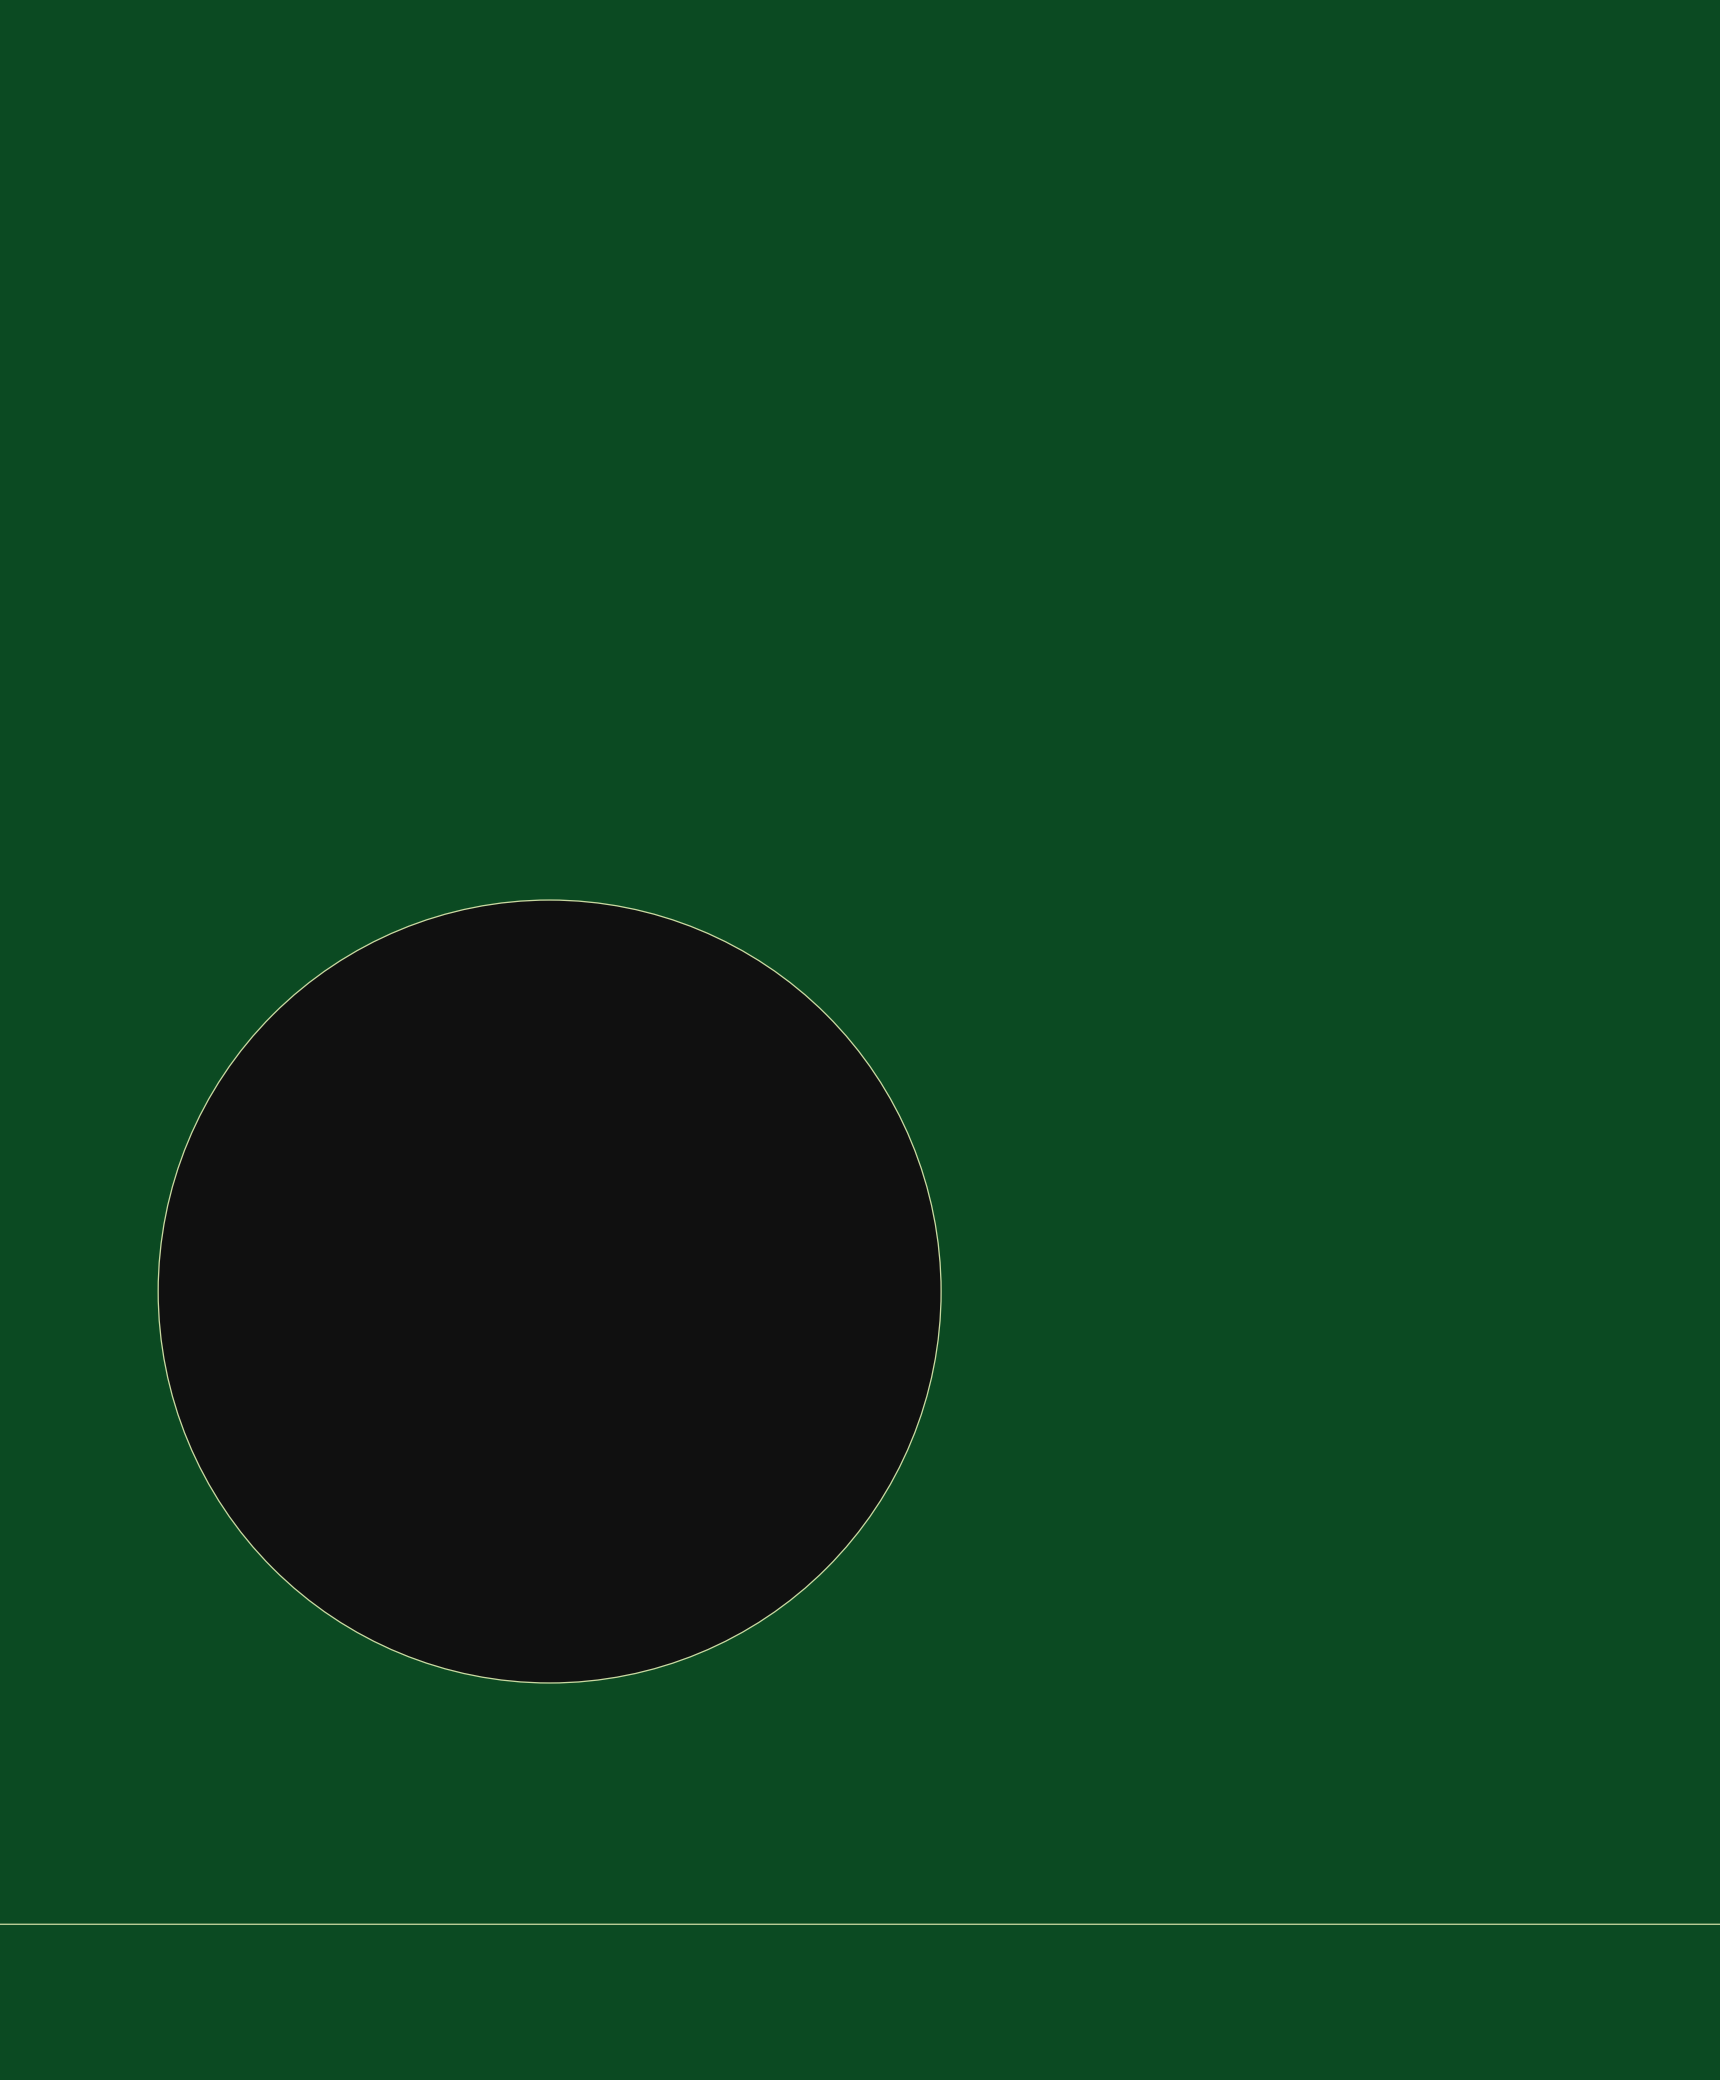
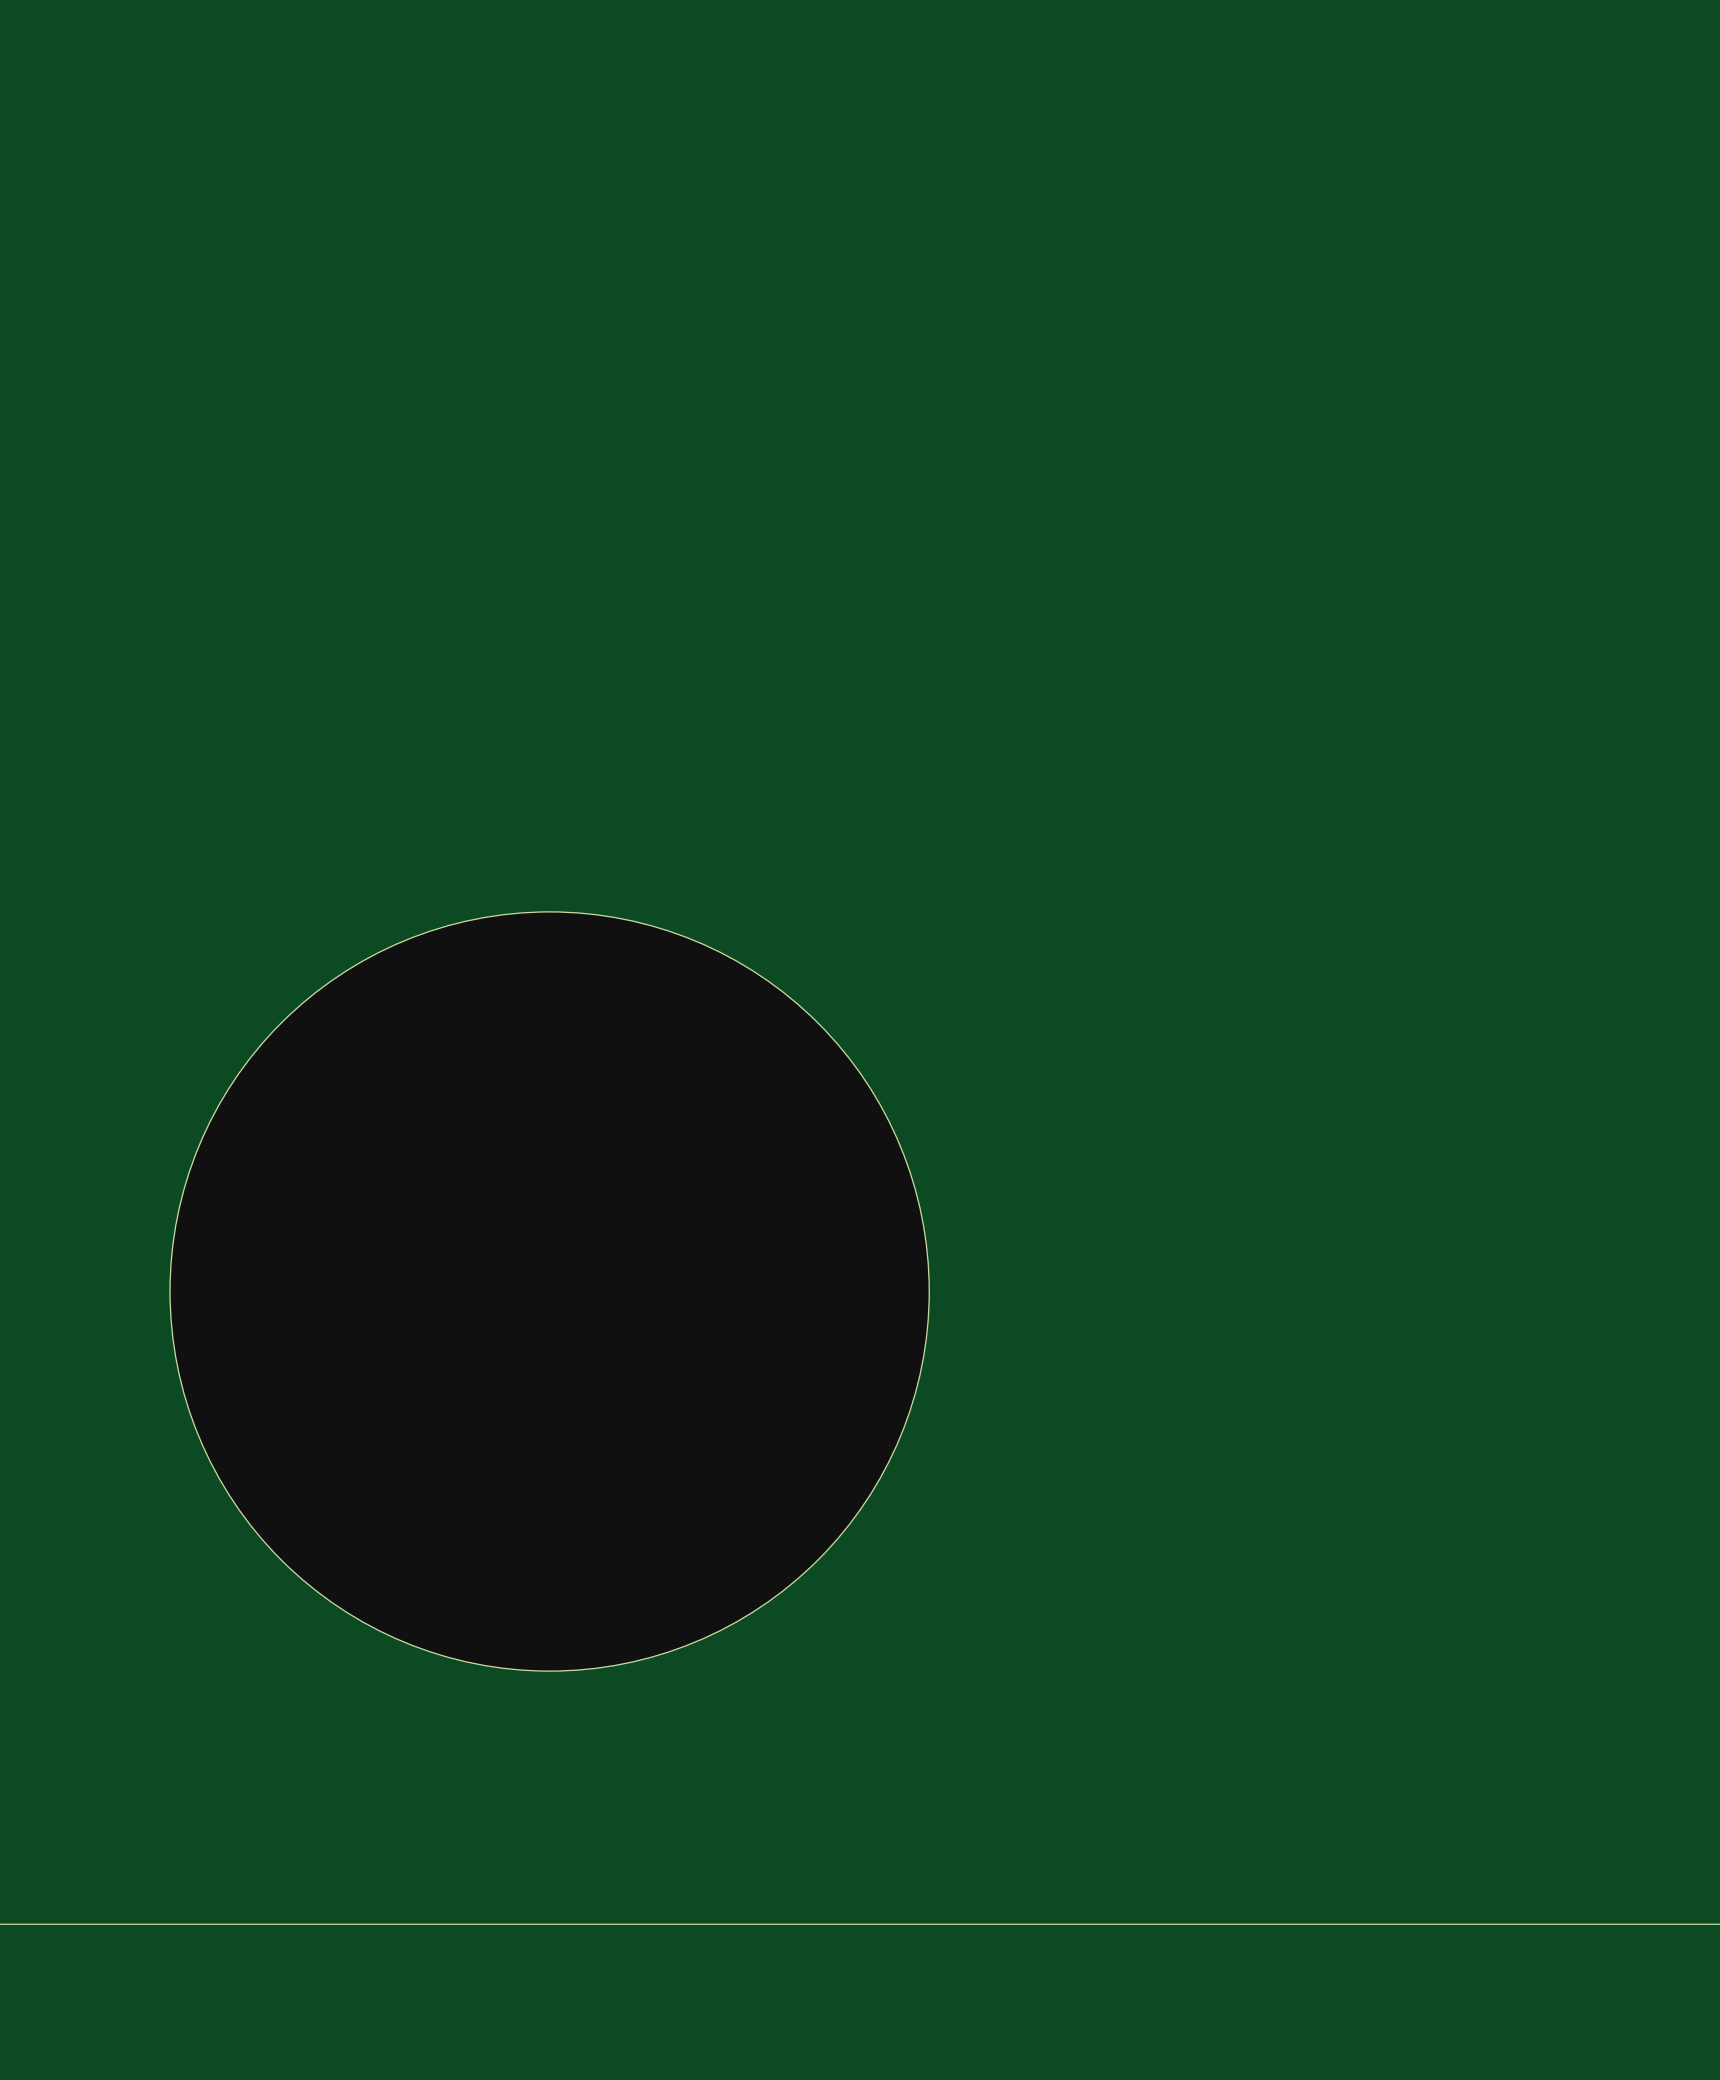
hole size: [158, 900, 942, 1683] -> [170, 911, 930, 1672]

